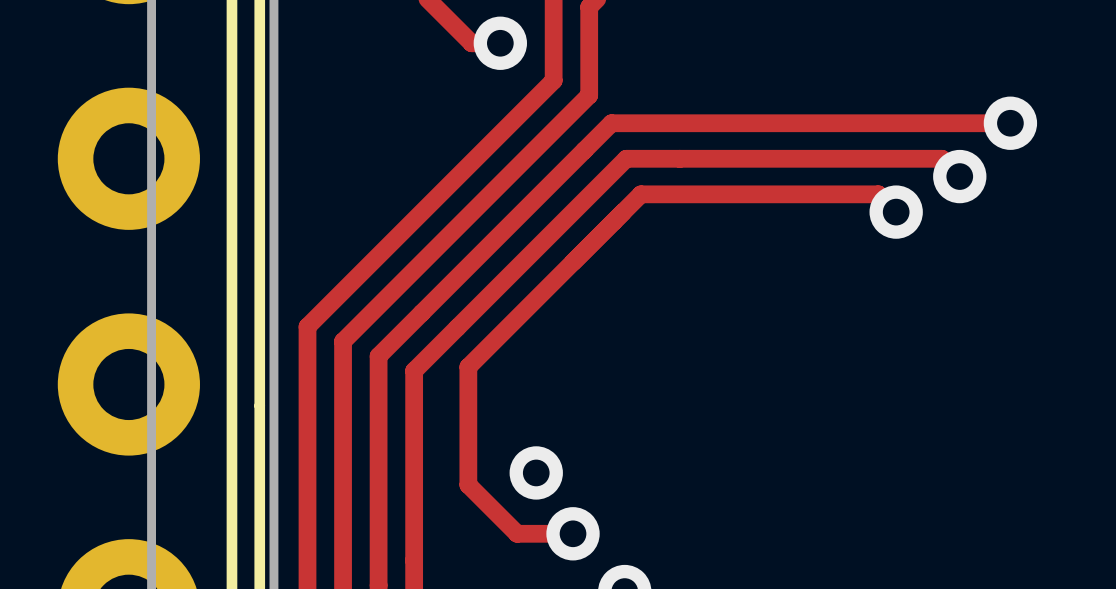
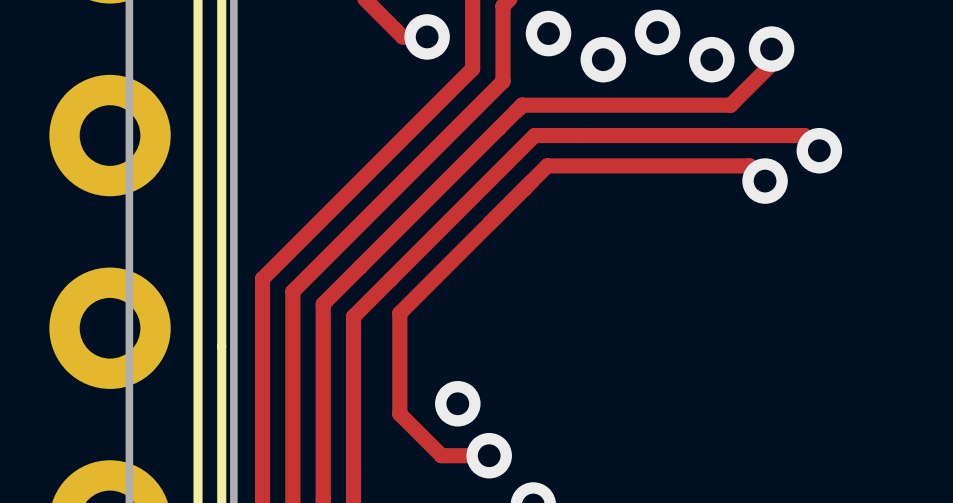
via: none -> (657, 32)
via: none -> (548, 33)
via: none -> (771, 49)
via: none -> (603, 59)
via: none -> (711, 59)
track: (855, 123) (1010, 123) -> (730, 105) (771, 64) (771, 49)
via: (1010, 123) -> none

